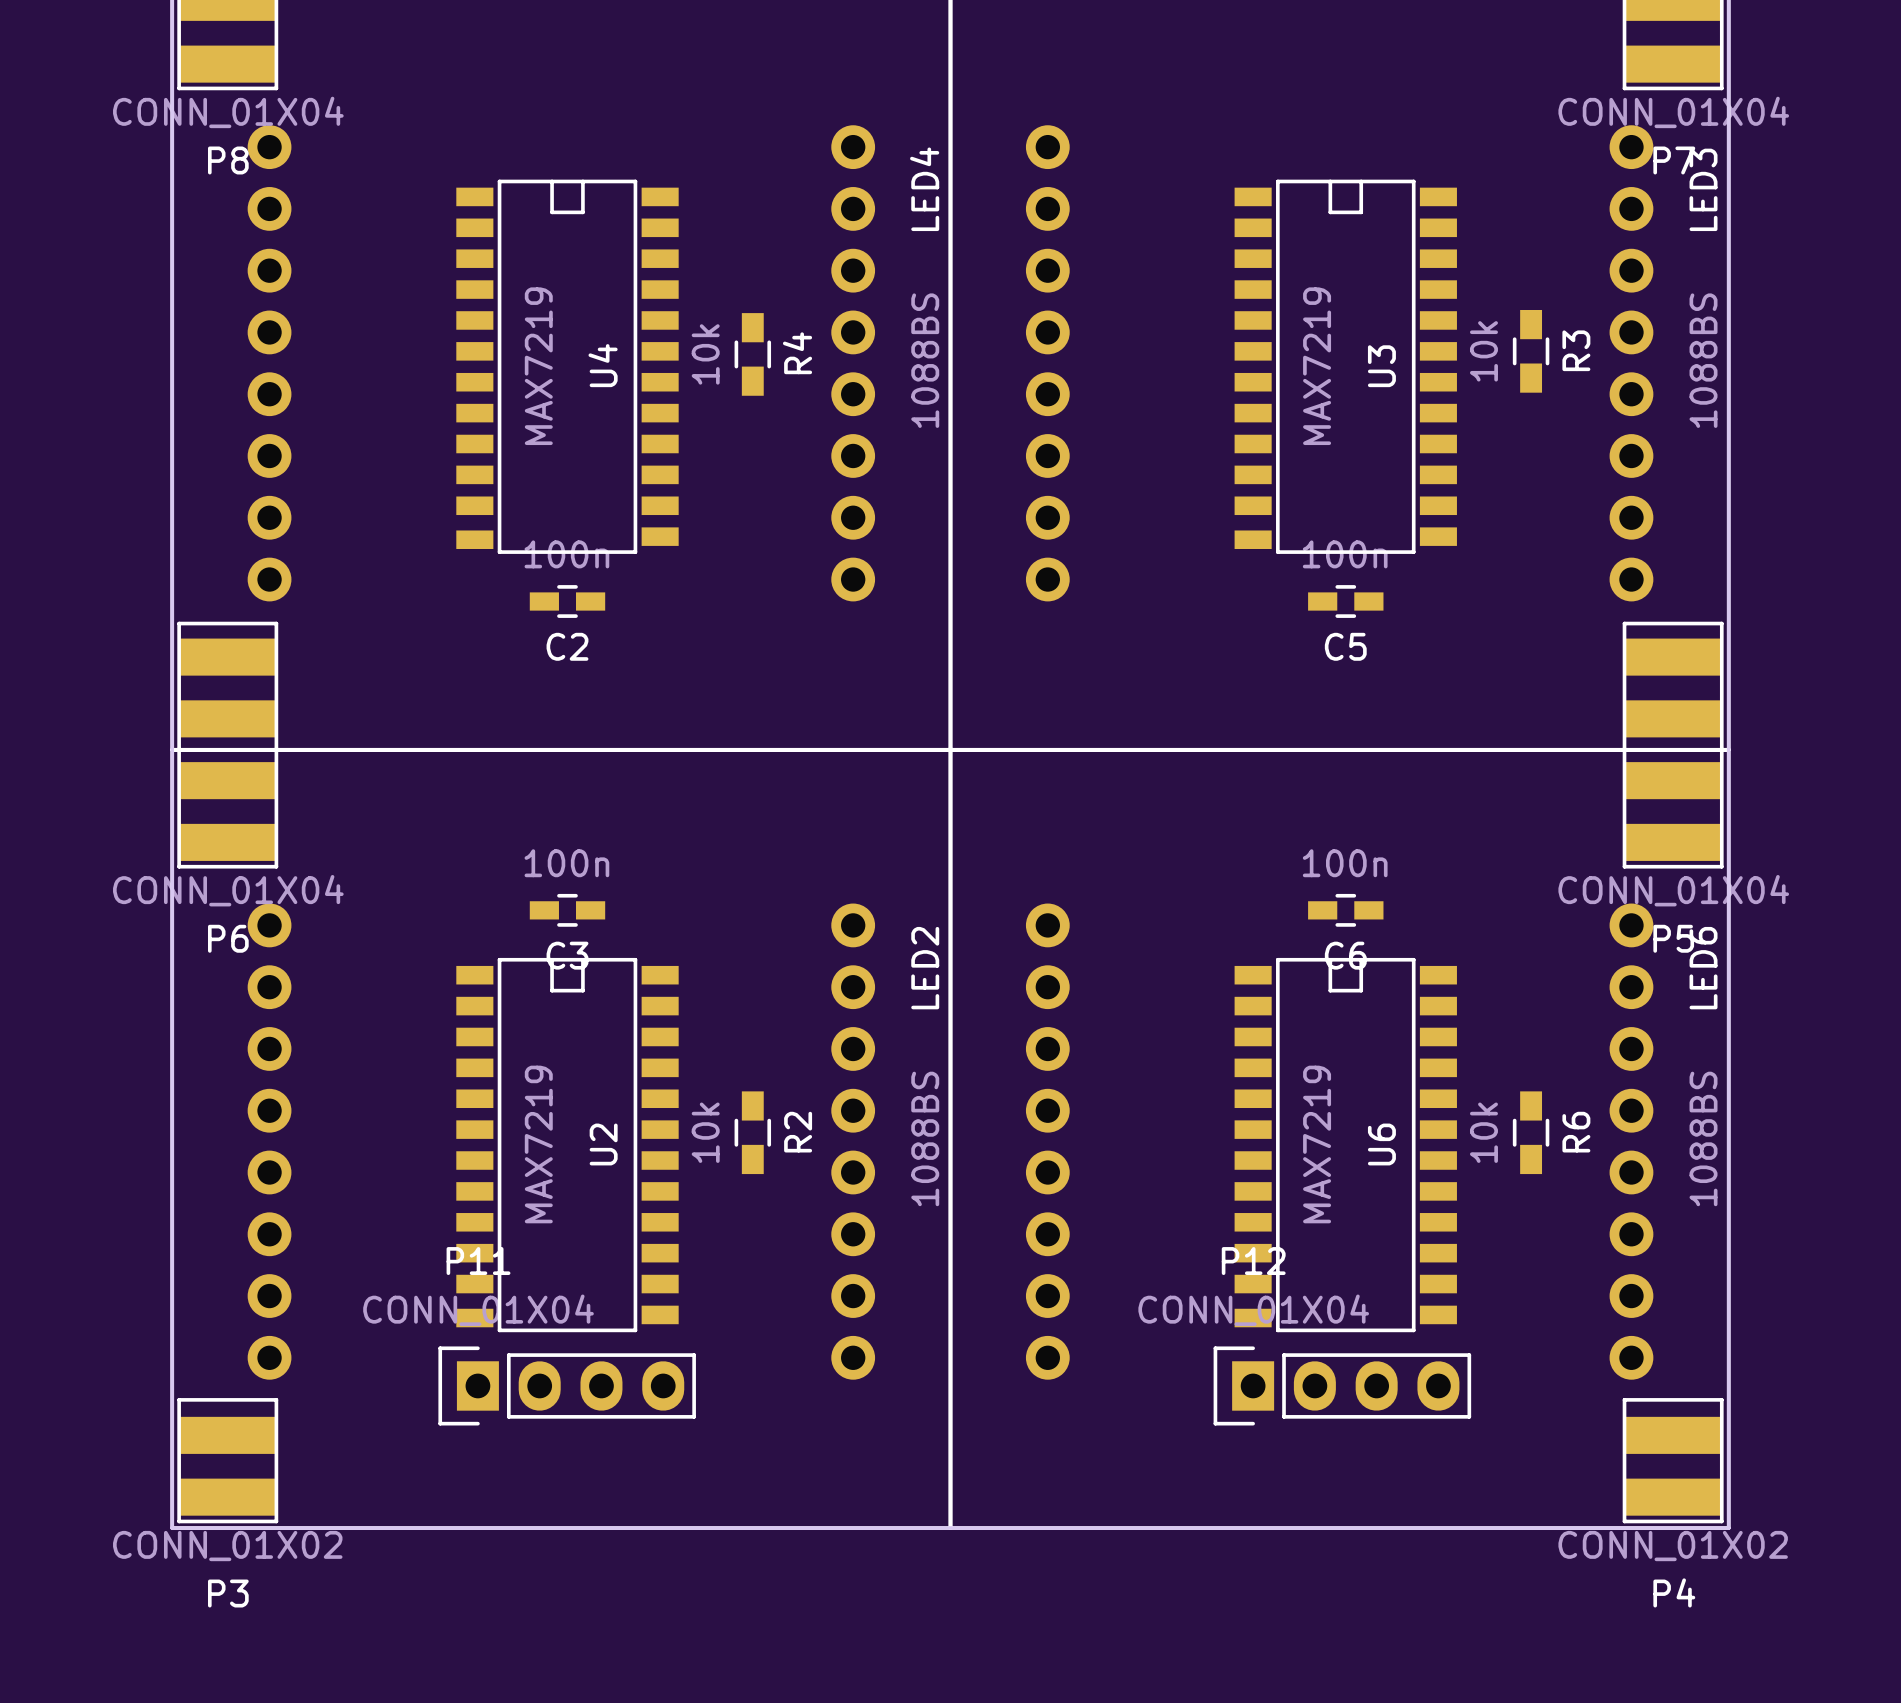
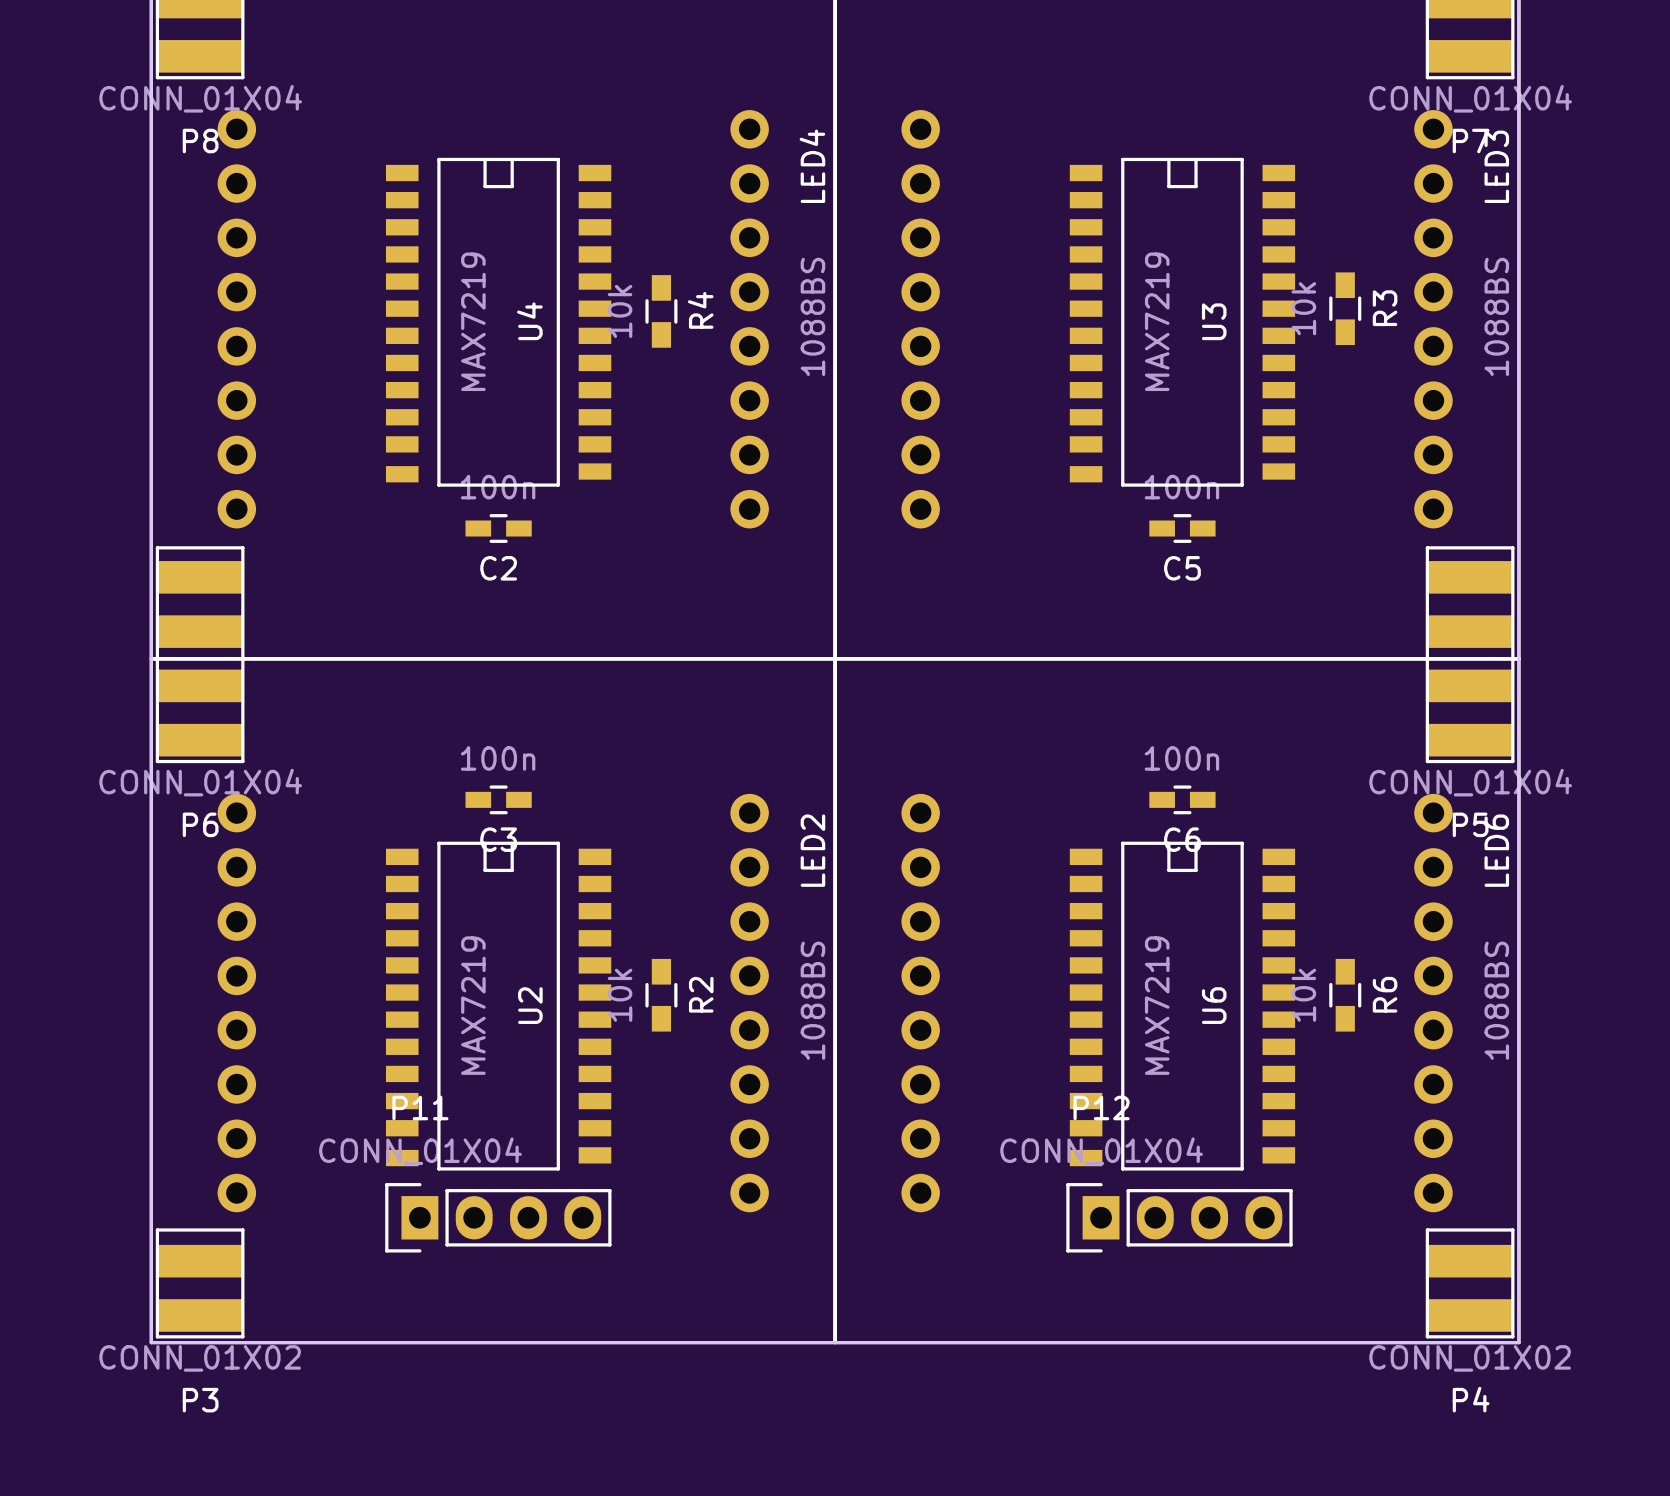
U4 footprint: [456, 179, 679, 554] -> [385, 157, 612, 487]
U3 footprint: [1234, 179, 1457, 554] -> [1069, 157, 1296, 487]
U2 footprint: [456, 957, 679, 1333] -> [385, 841, 612, 1171]
U6 footprint: [1234, 957, 1457, 1333] -> [1069, 841, 1296, 1171]

